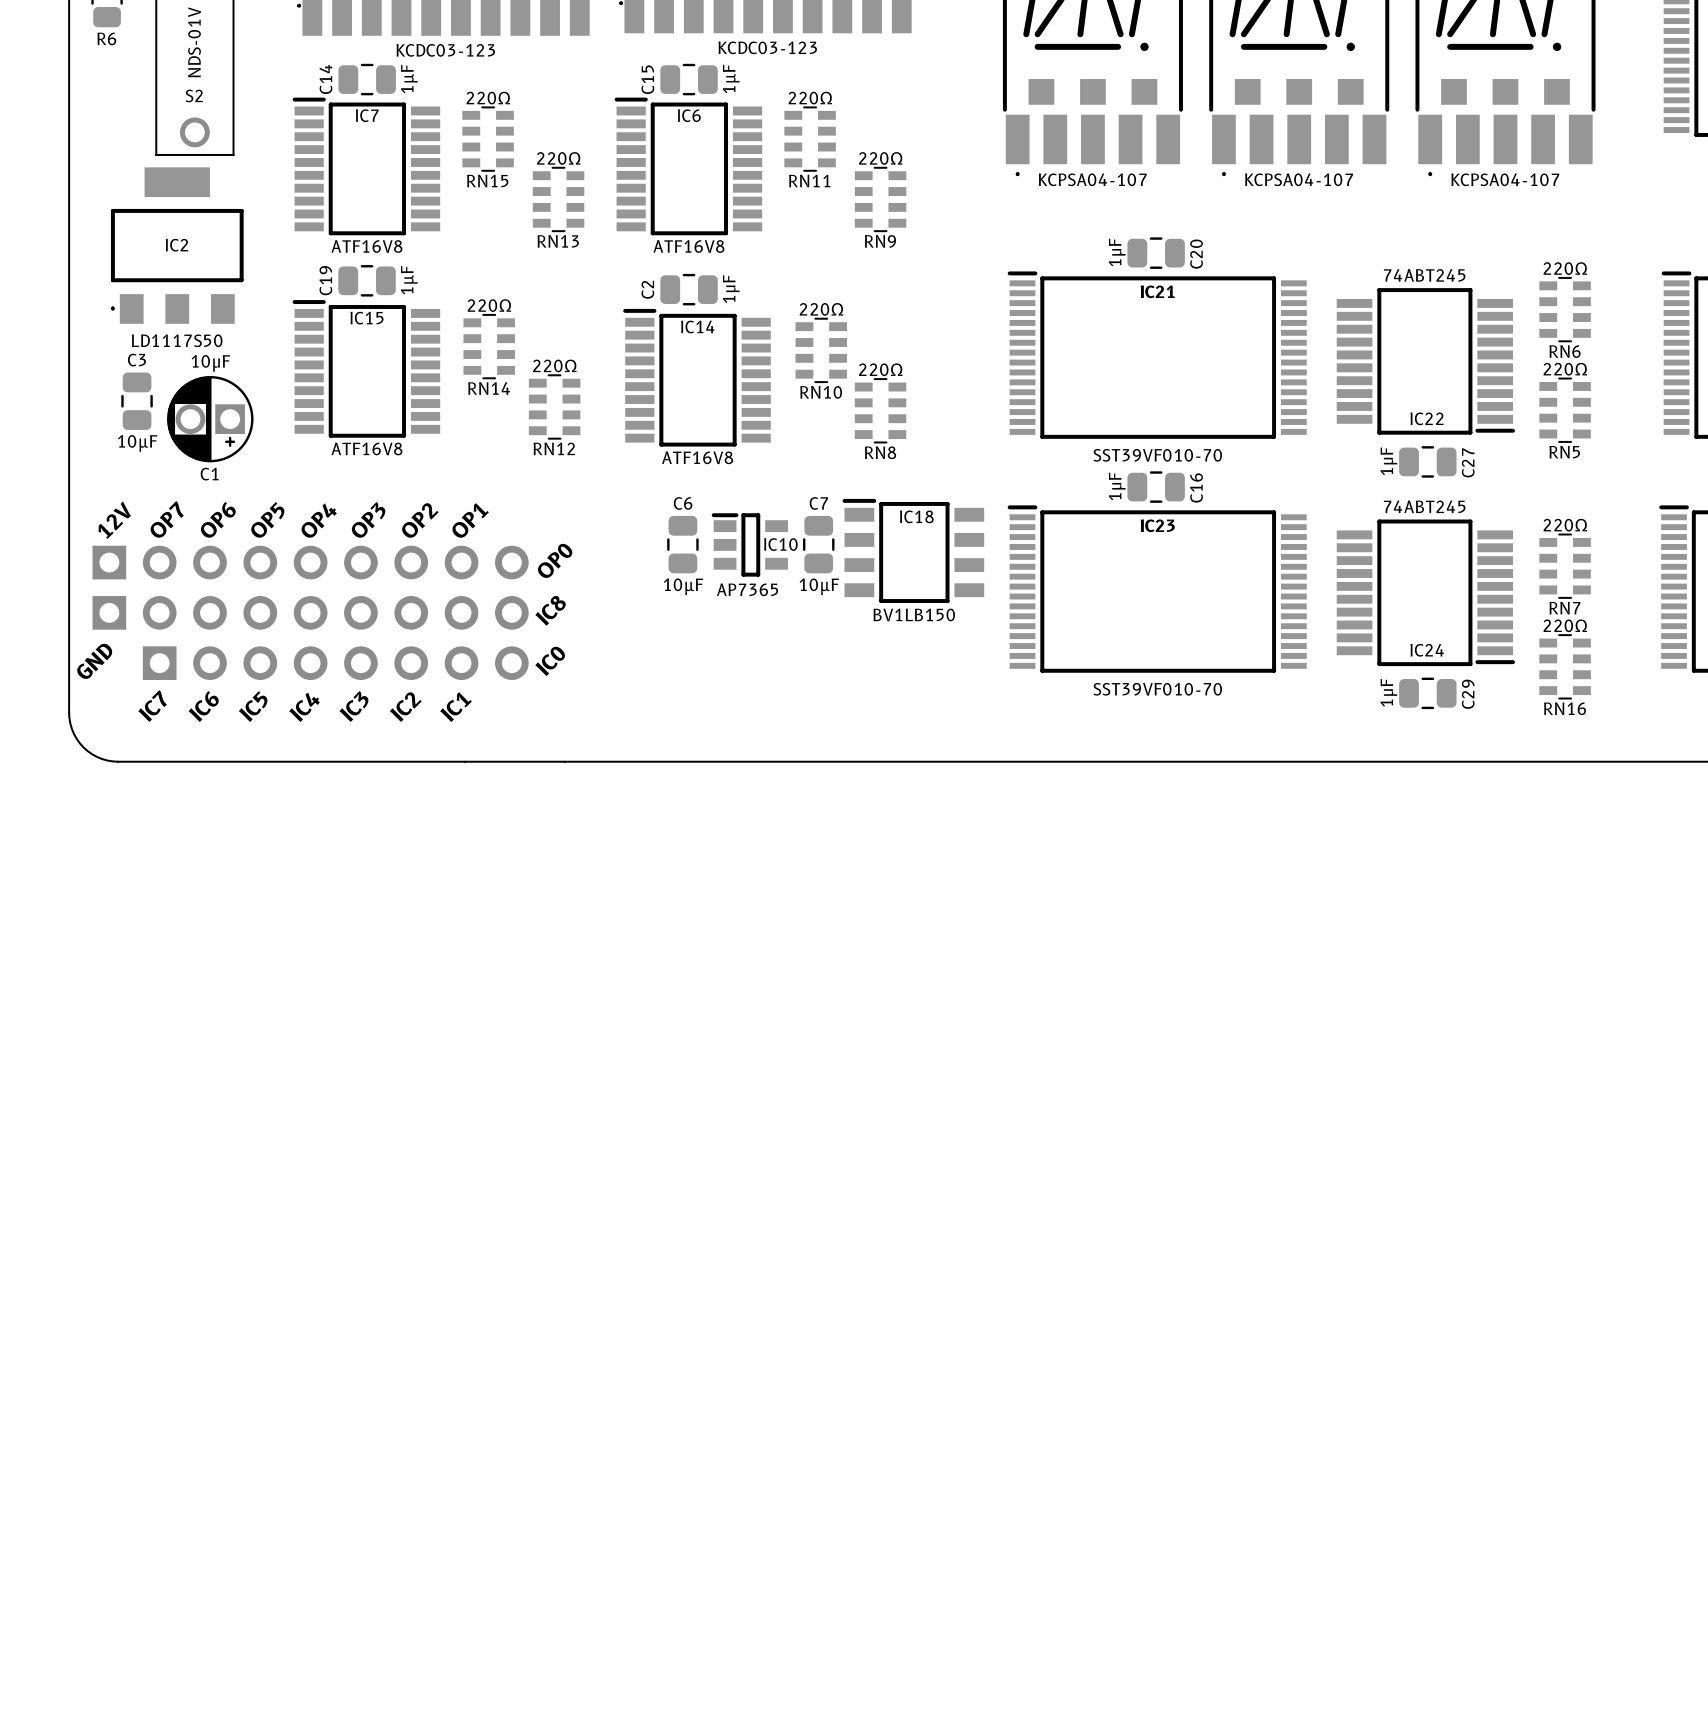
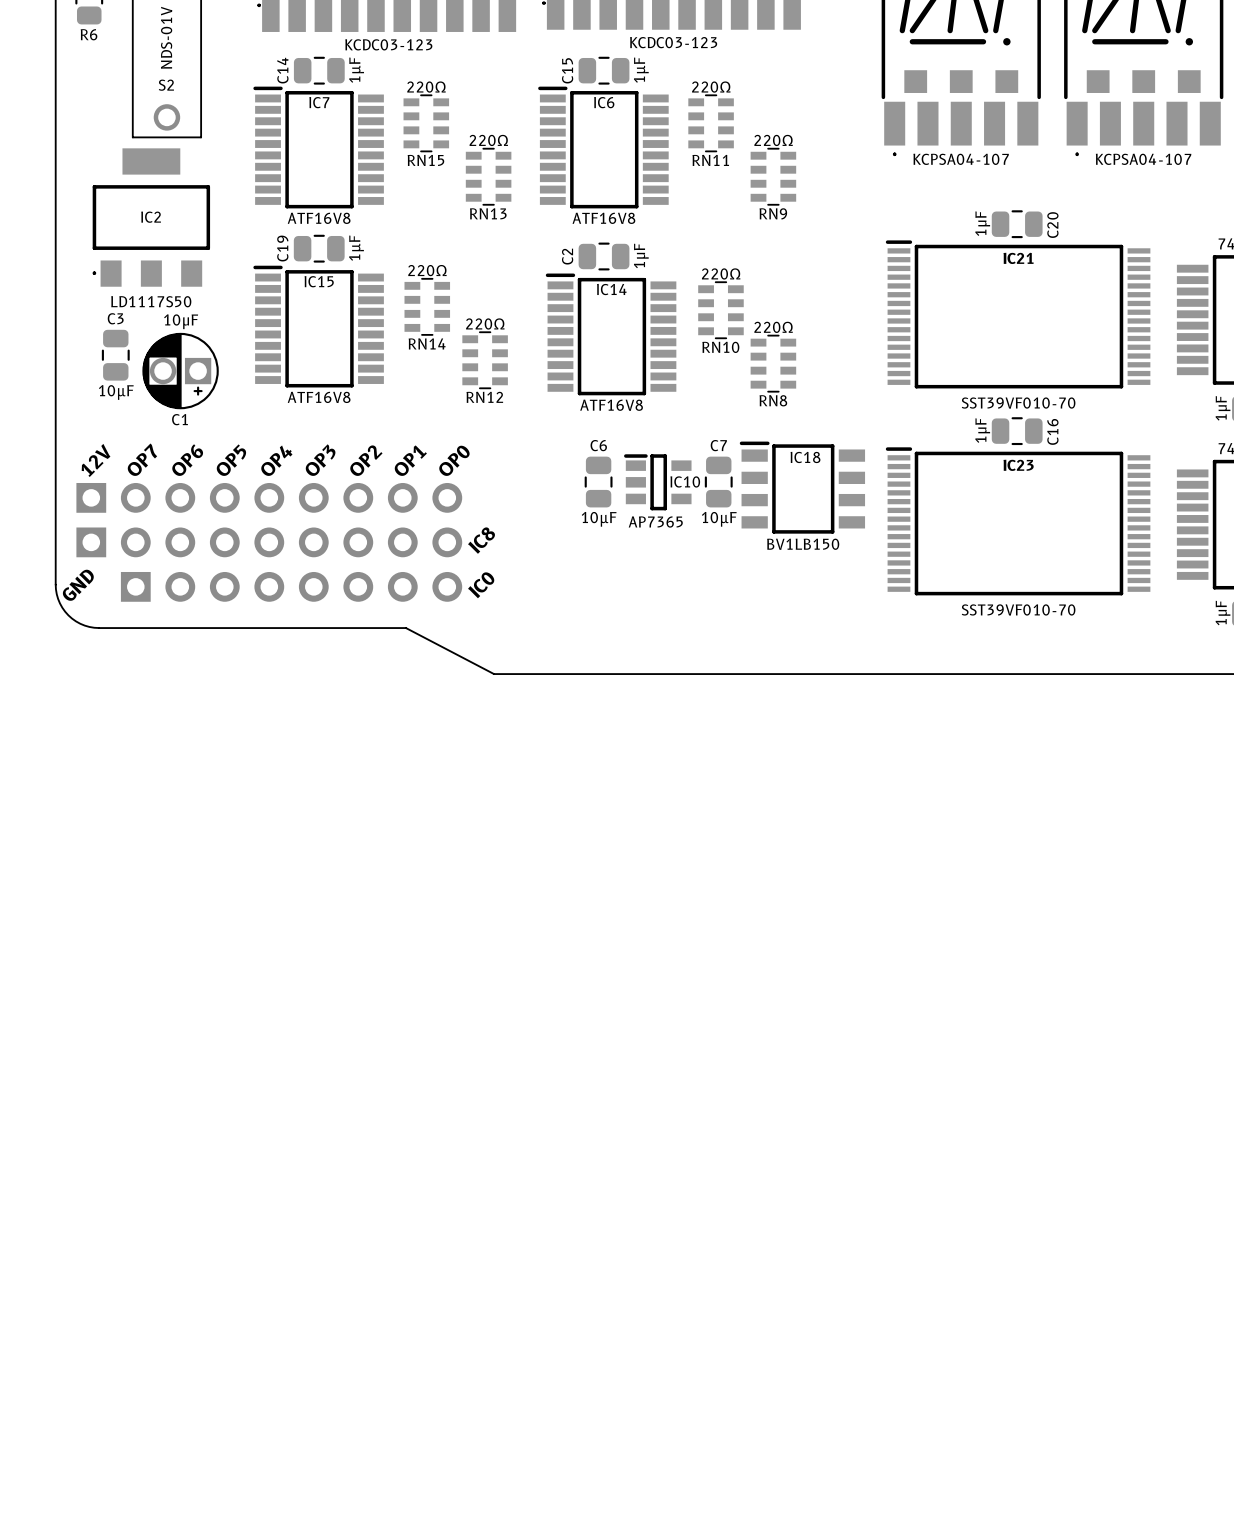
text position: OP0 (555, 560) -> OP0 (454, 460)
board edge: (69, 660) (69, 712) (71, 728) (83, 747) (96, 756) (107, 760) (564, 761) -> (55, 584) (58, 598) (65, 611) (76, 621) (89, 626) (405, 628) (494, 674)
text: IC7 (152, 706) -> none
text: IC6 (203, 706) -> none
text: IC5 (253, 706) -> none
text: IC3 (353, 706) -> none
text: IC4 (304, 707) -> none
text: IC2 (405, 707) -> none
text: IC1 (455, 707) -> none

